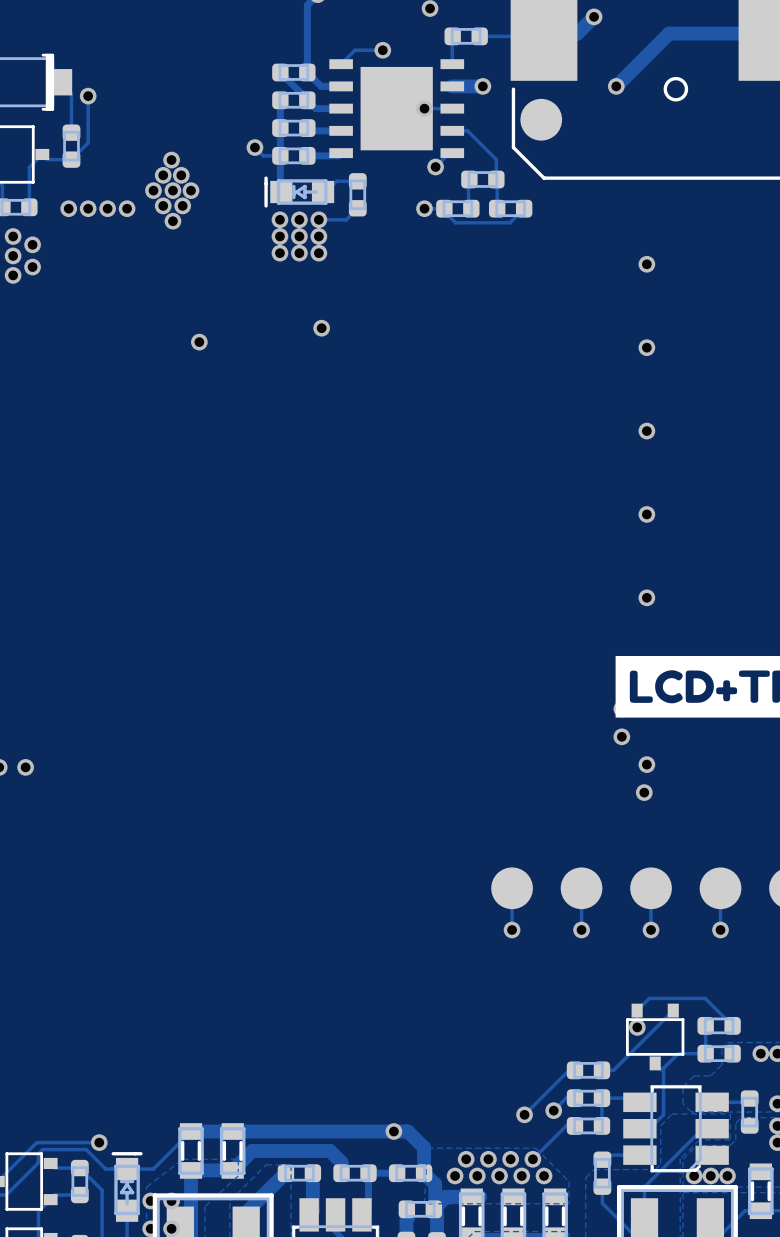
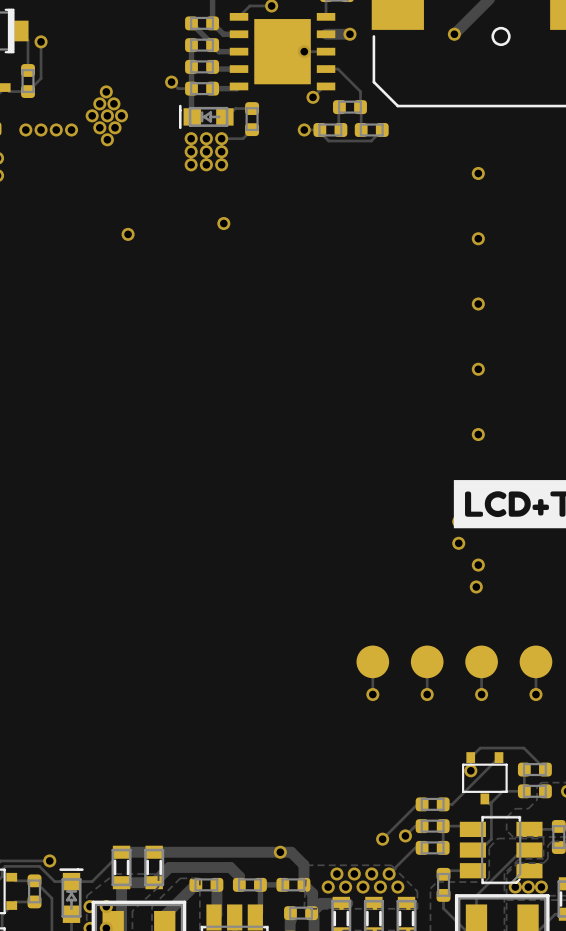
part: (541, 119) -> none

